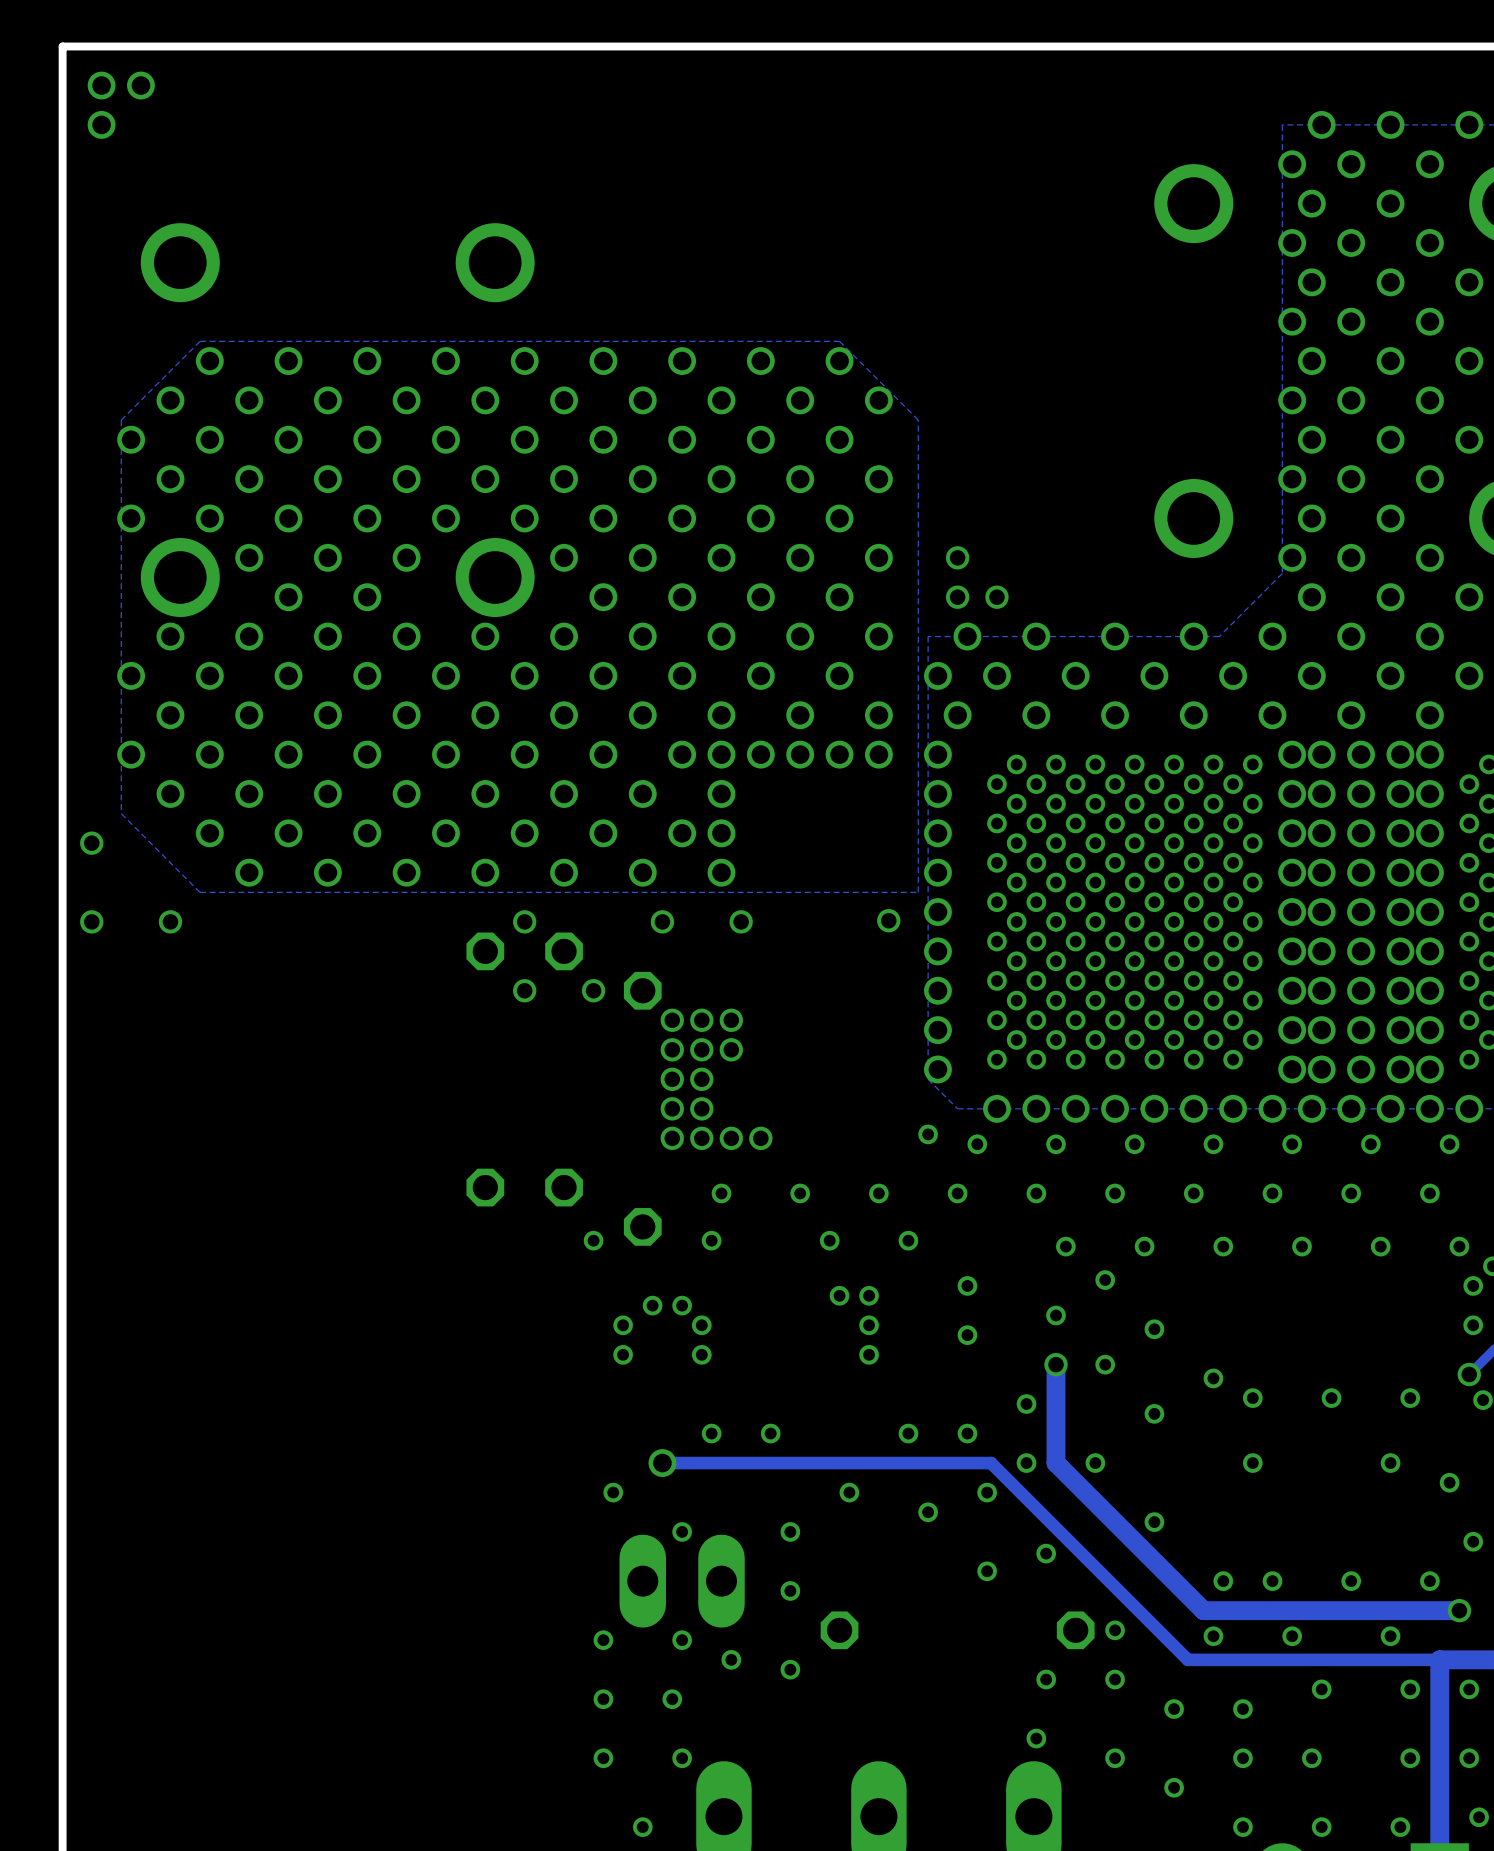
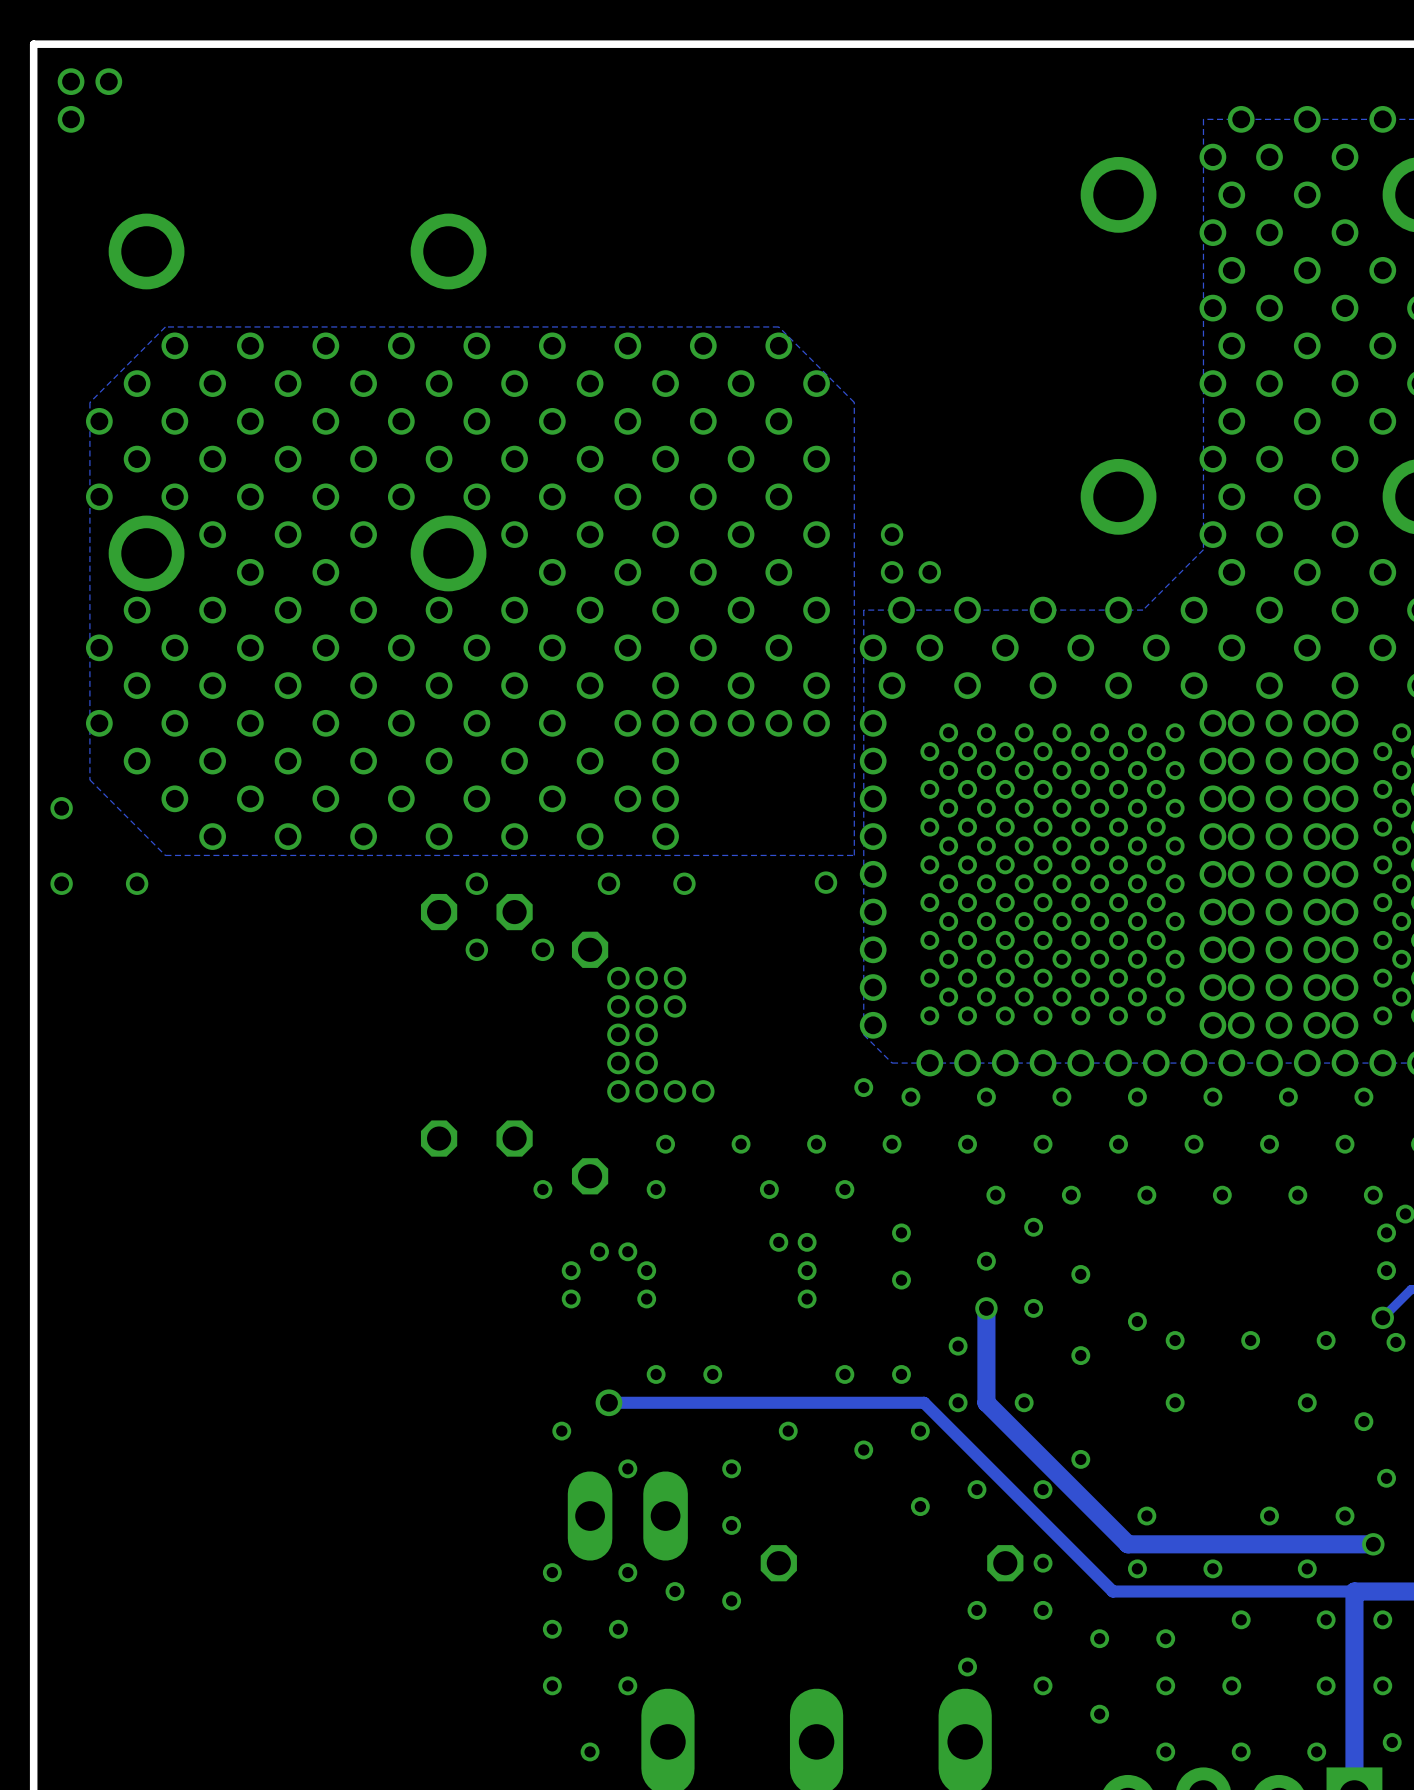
via position: (1272, 1581) -> (1043, 1489)

